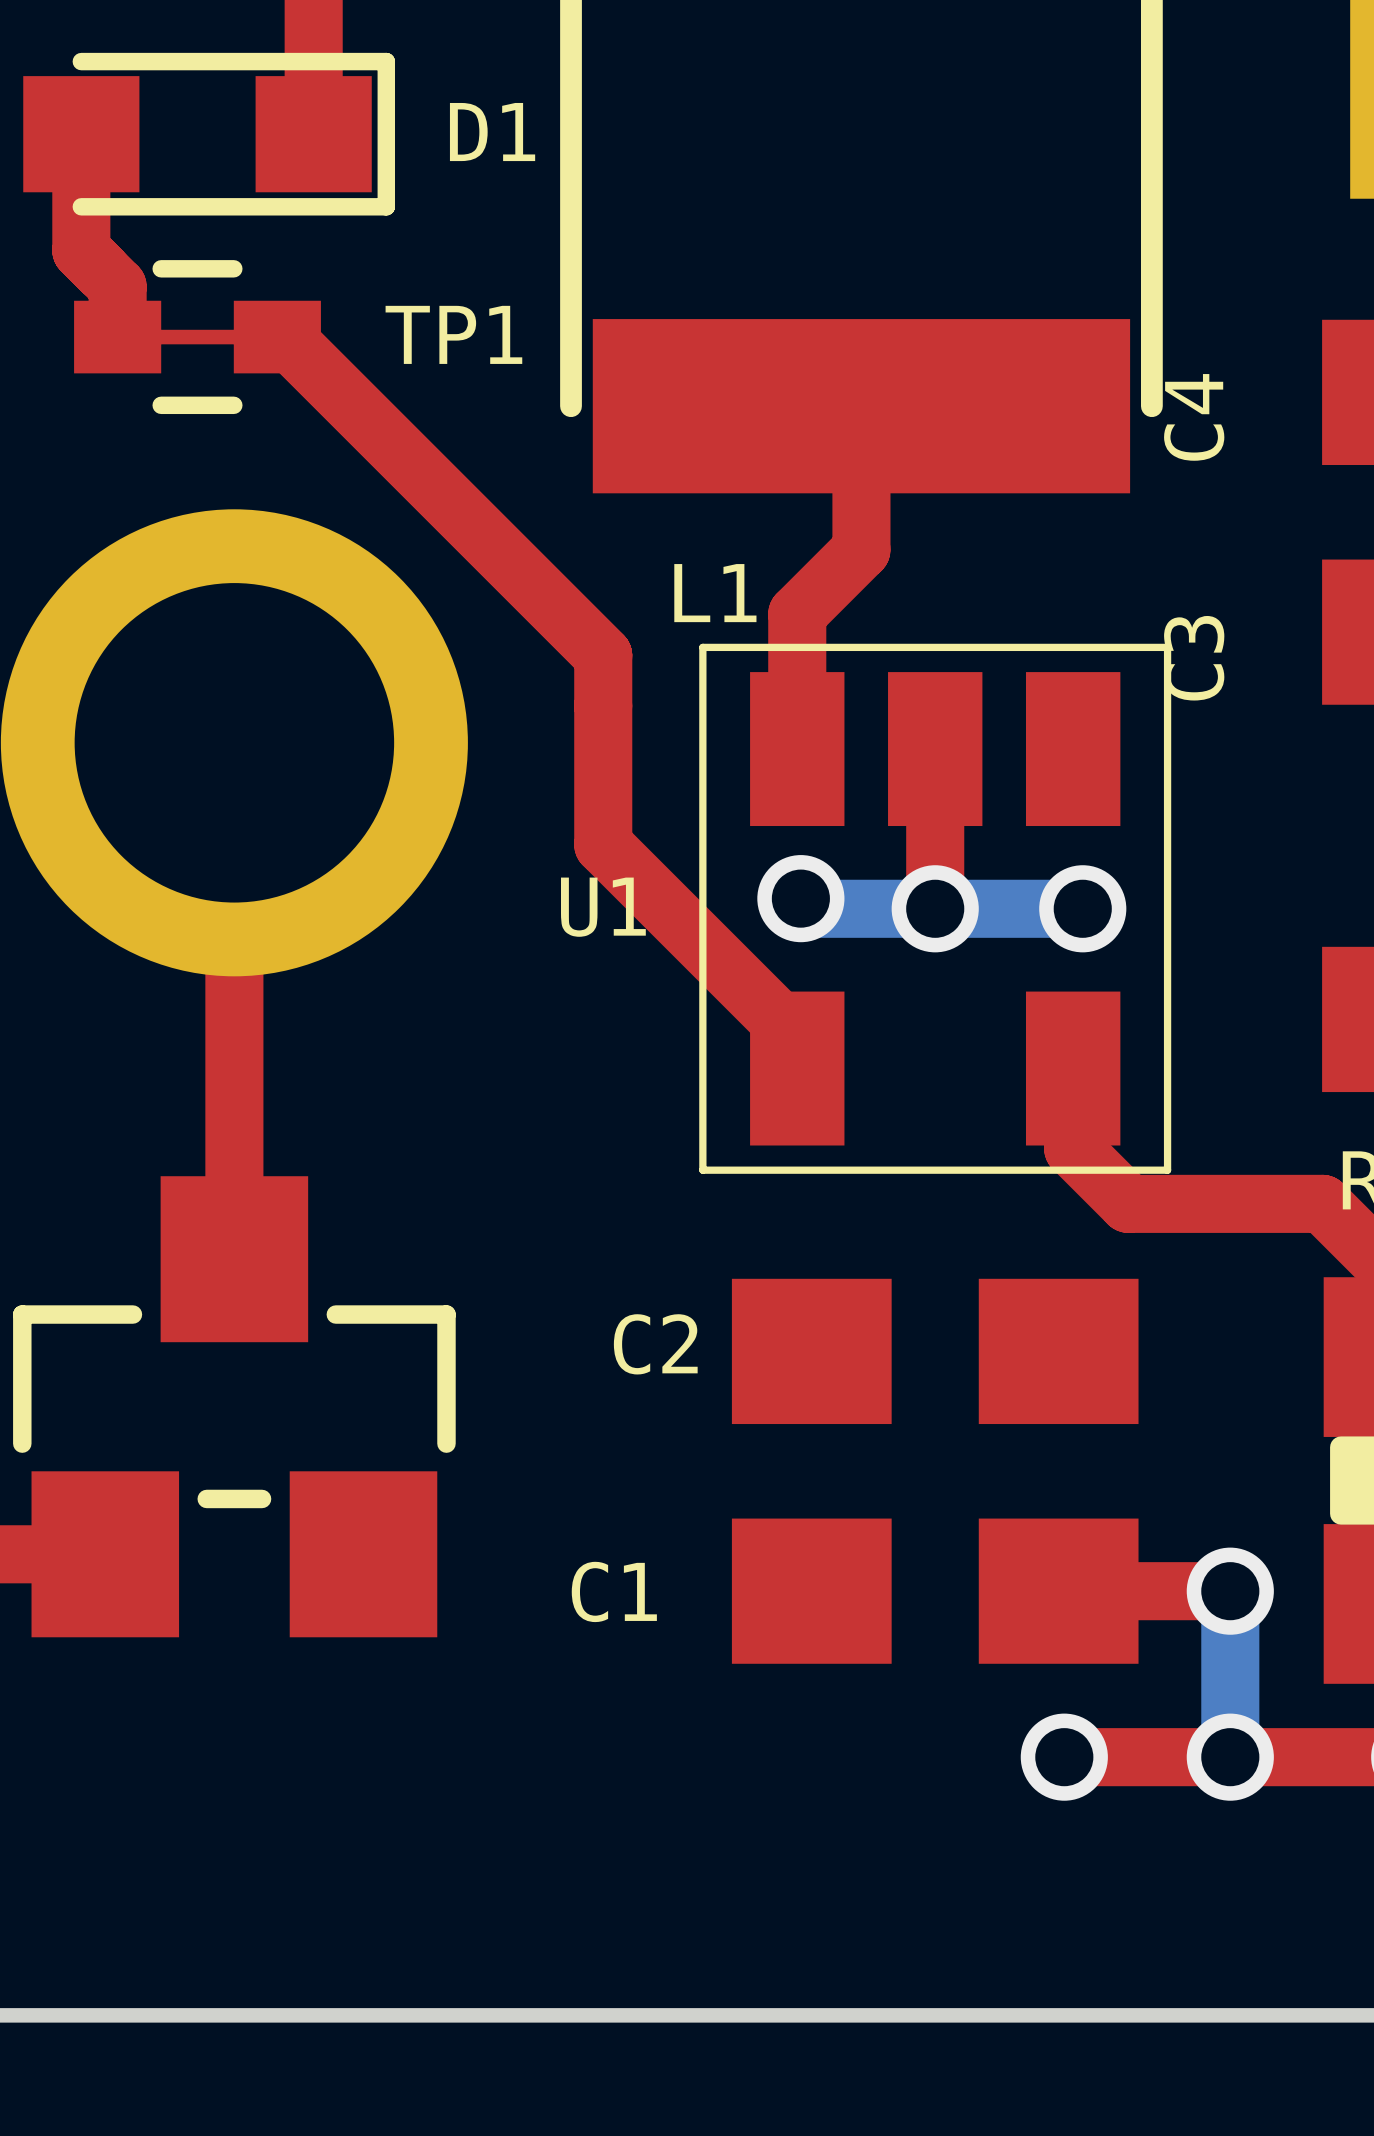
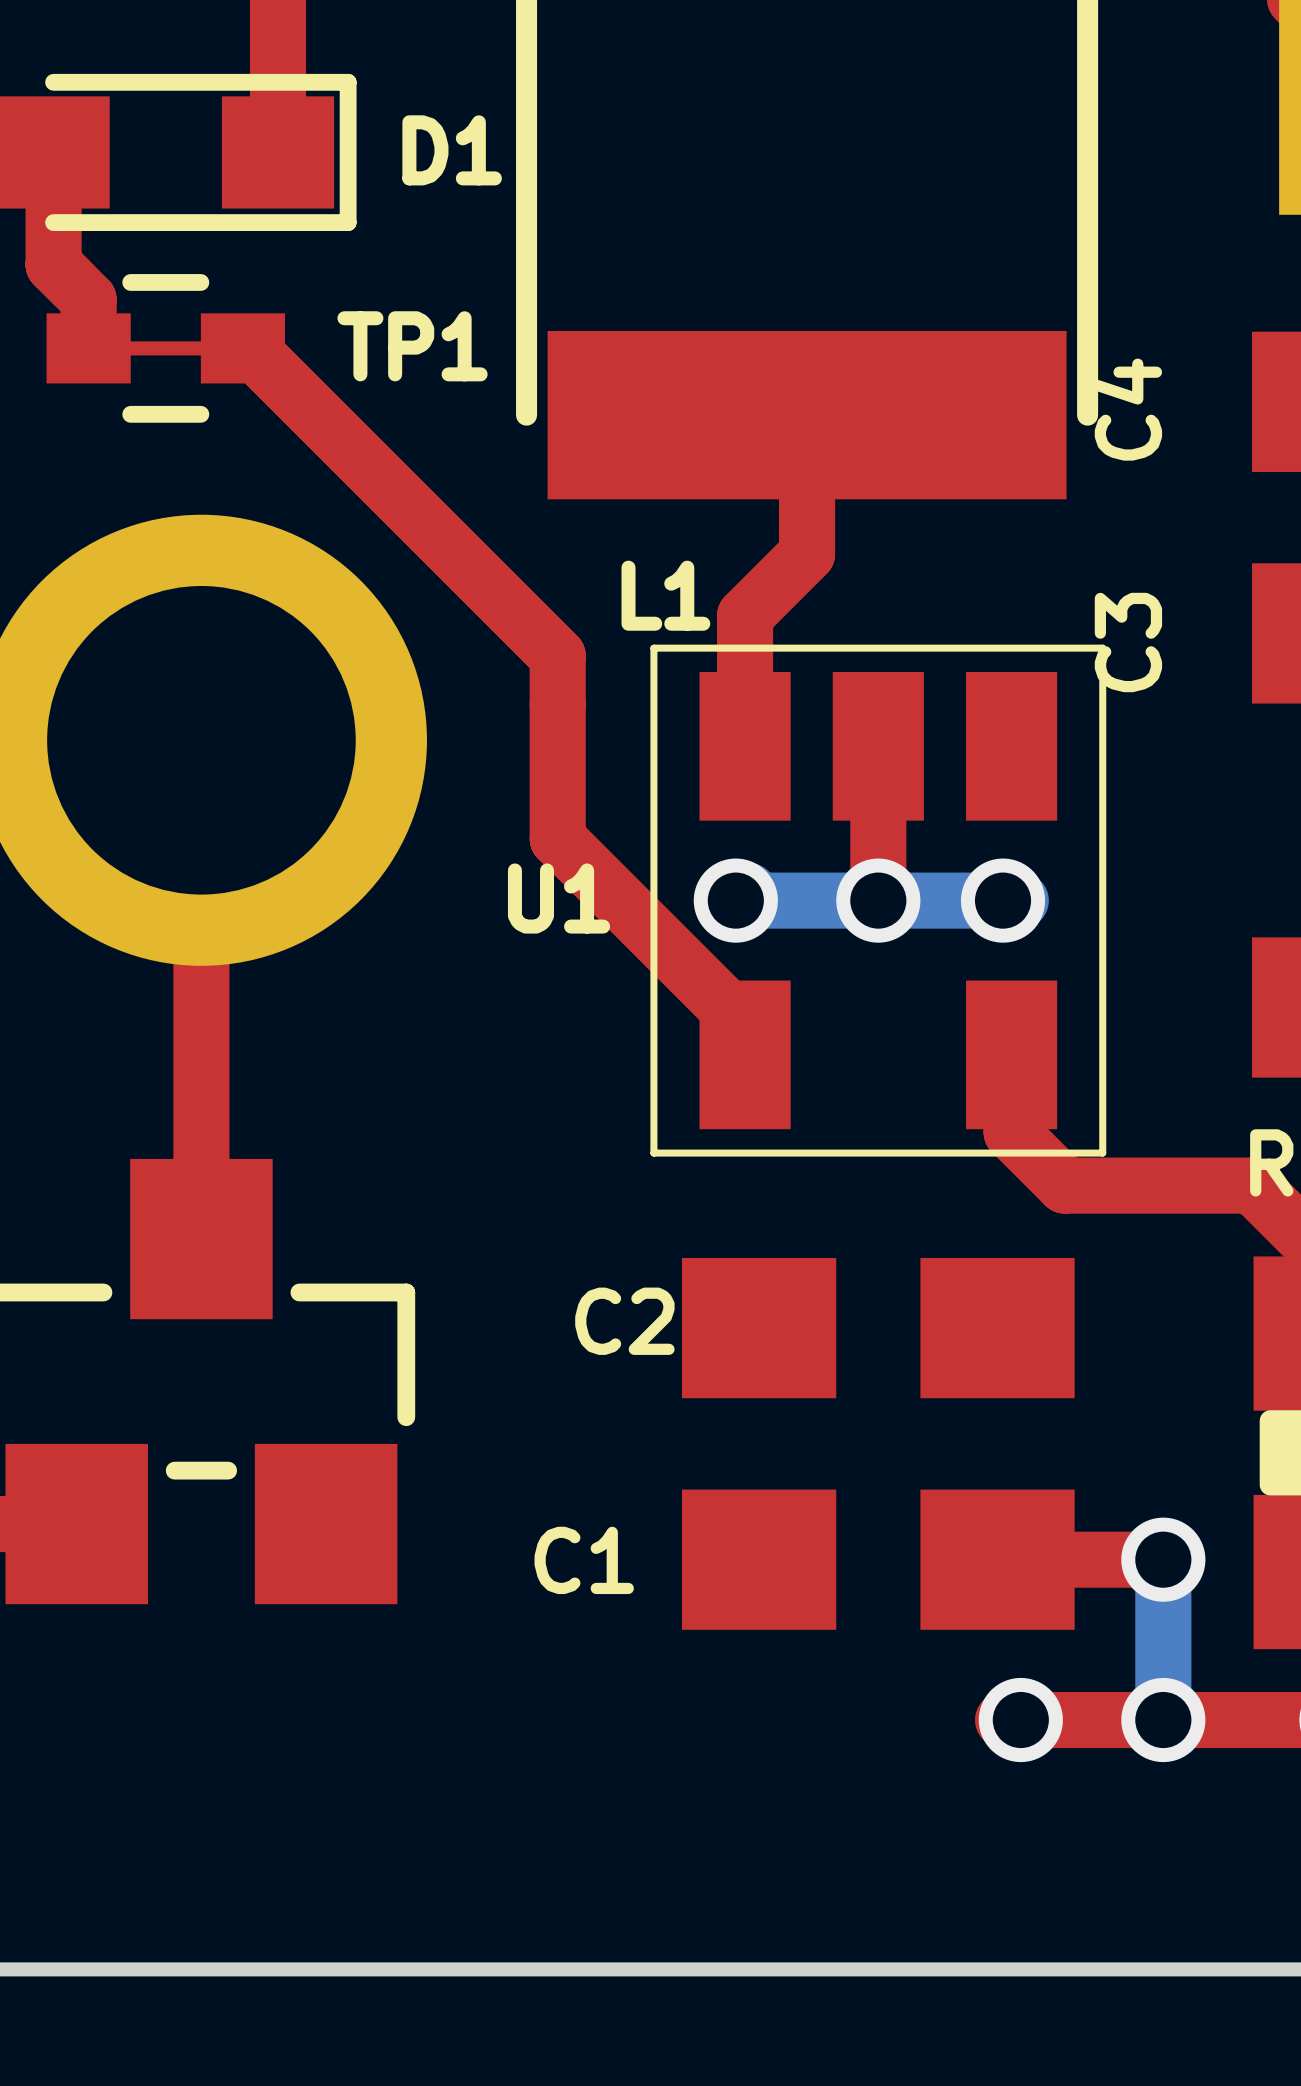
via position: (800, 898) -> (735, 900)
via position: (1082, 908) -> (1003, 900)
via position: (1064, 1757) -> (1020, 1720)

